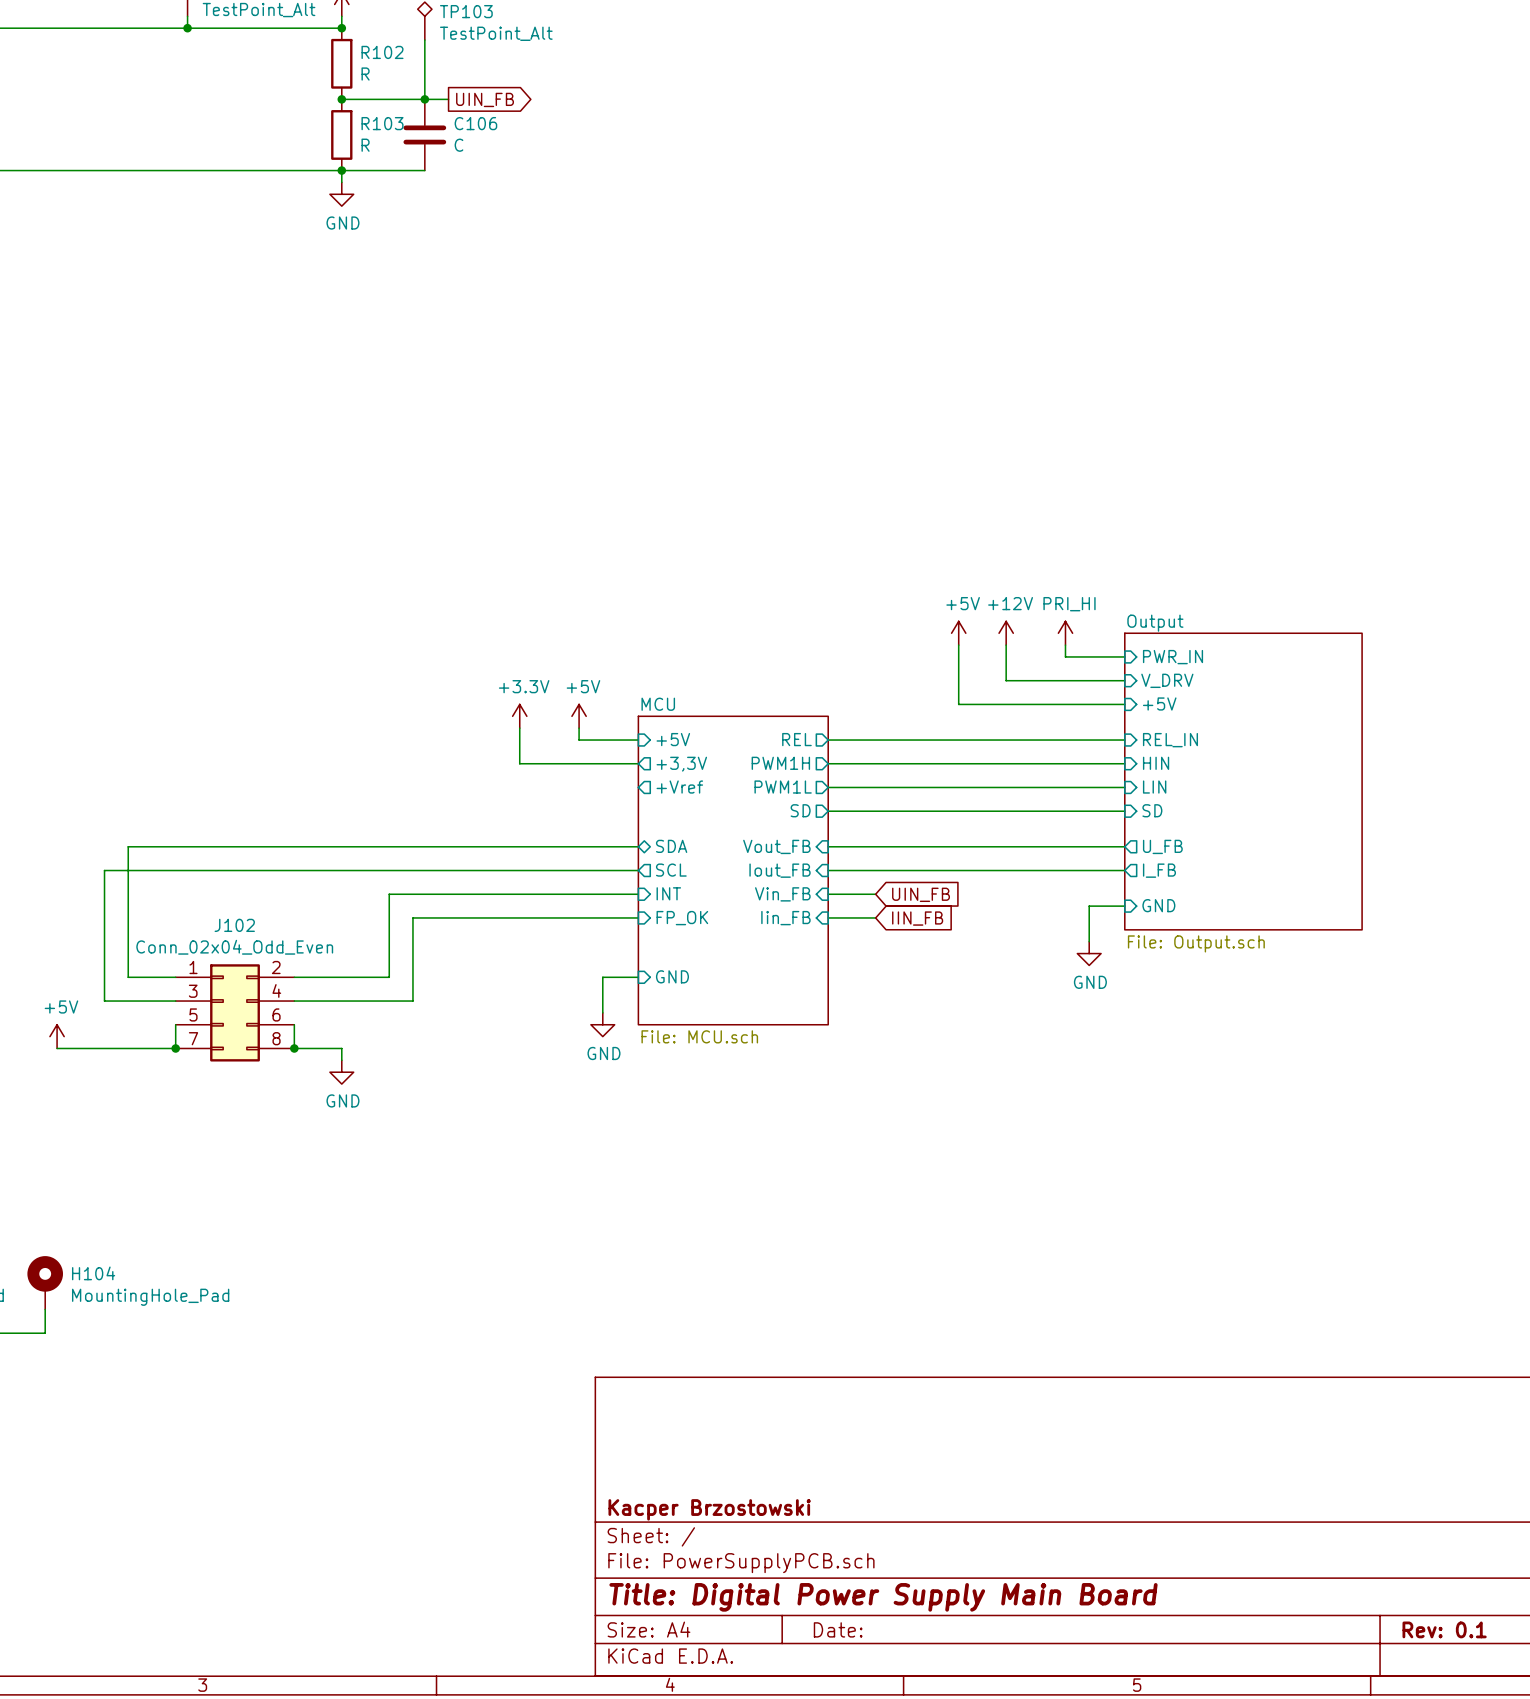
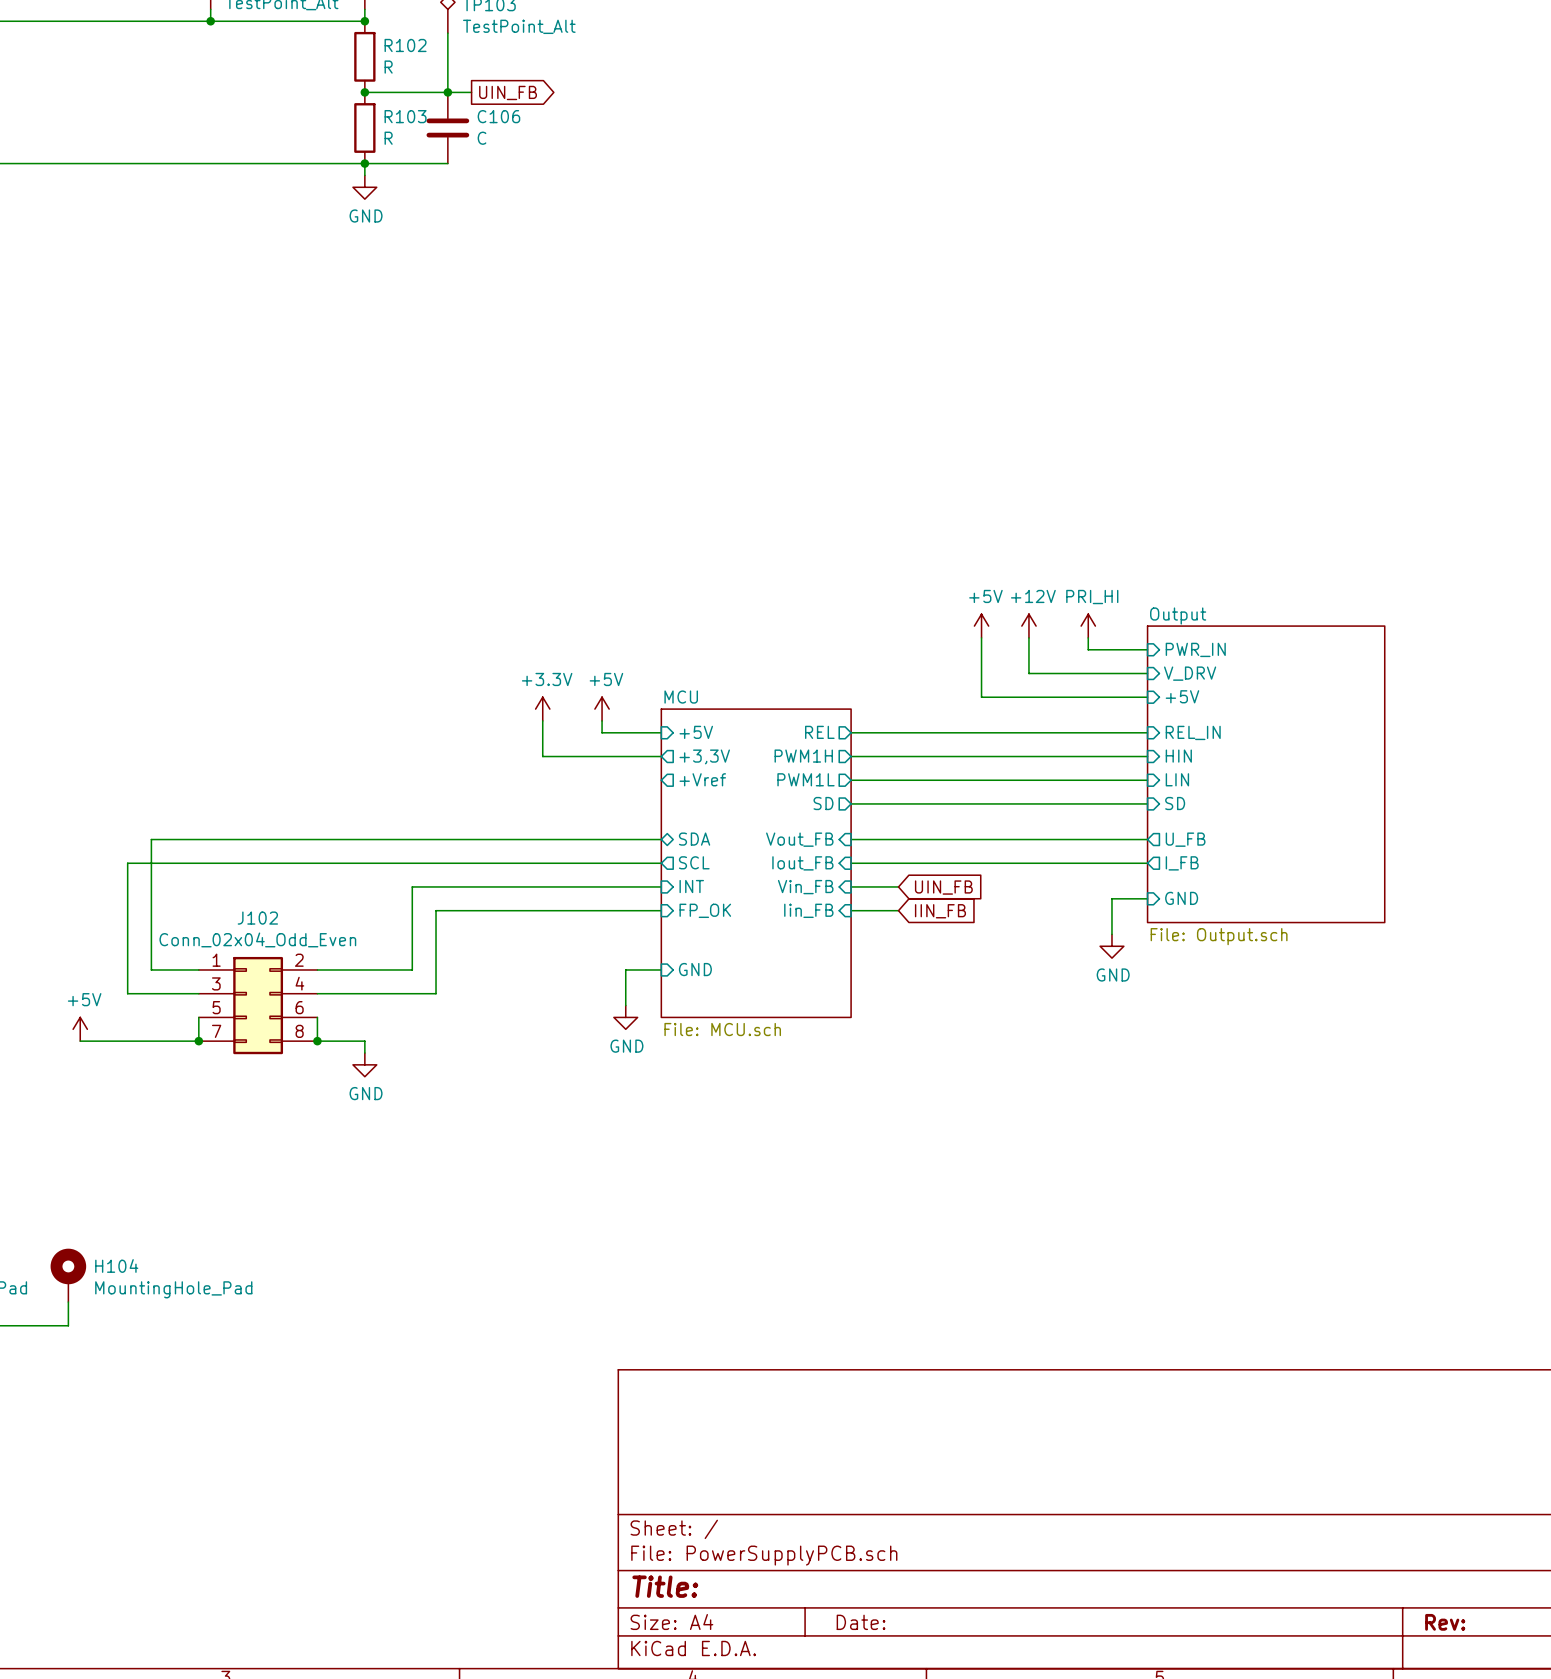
title block: Kacper Brzostowski (709, 1509) -> none
title block: Title: Digital Power Supply Main Board (883, 1597) -> Title: (665, 1586)
title block: Rev: 0.1 (1444, 1629) -> Rev: (1445, 1622)

